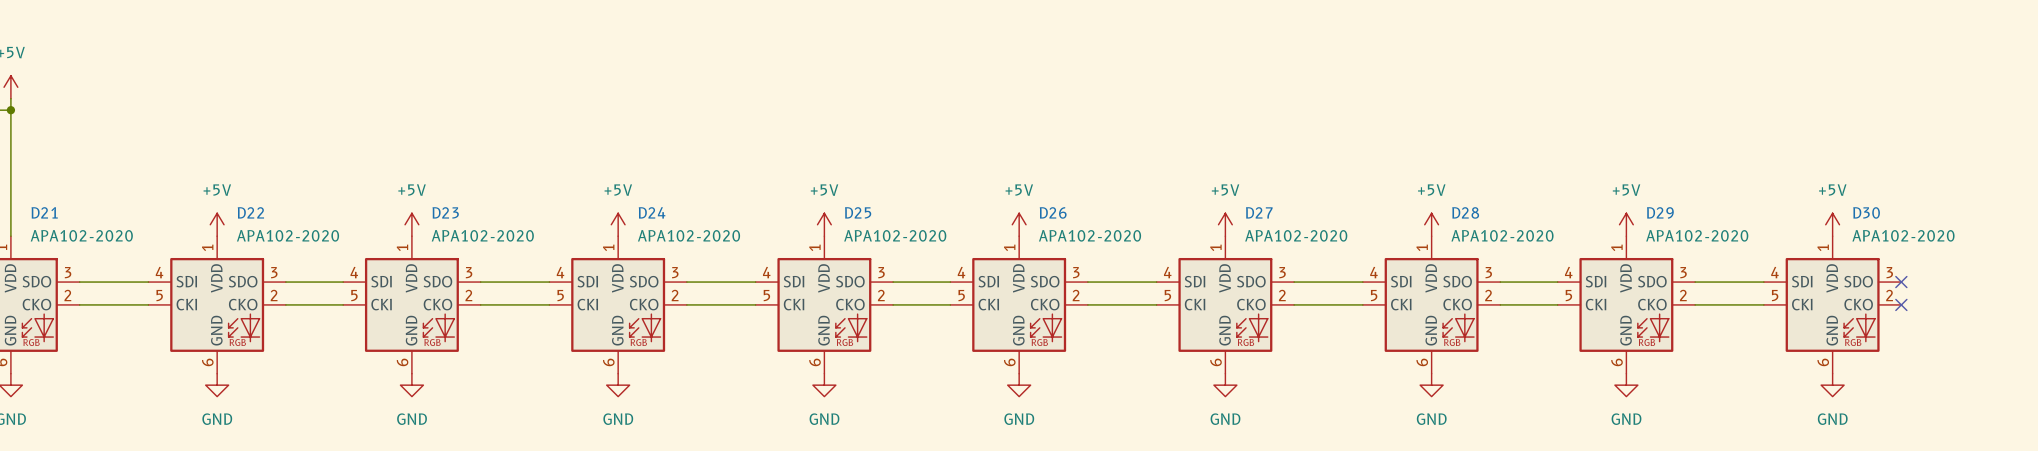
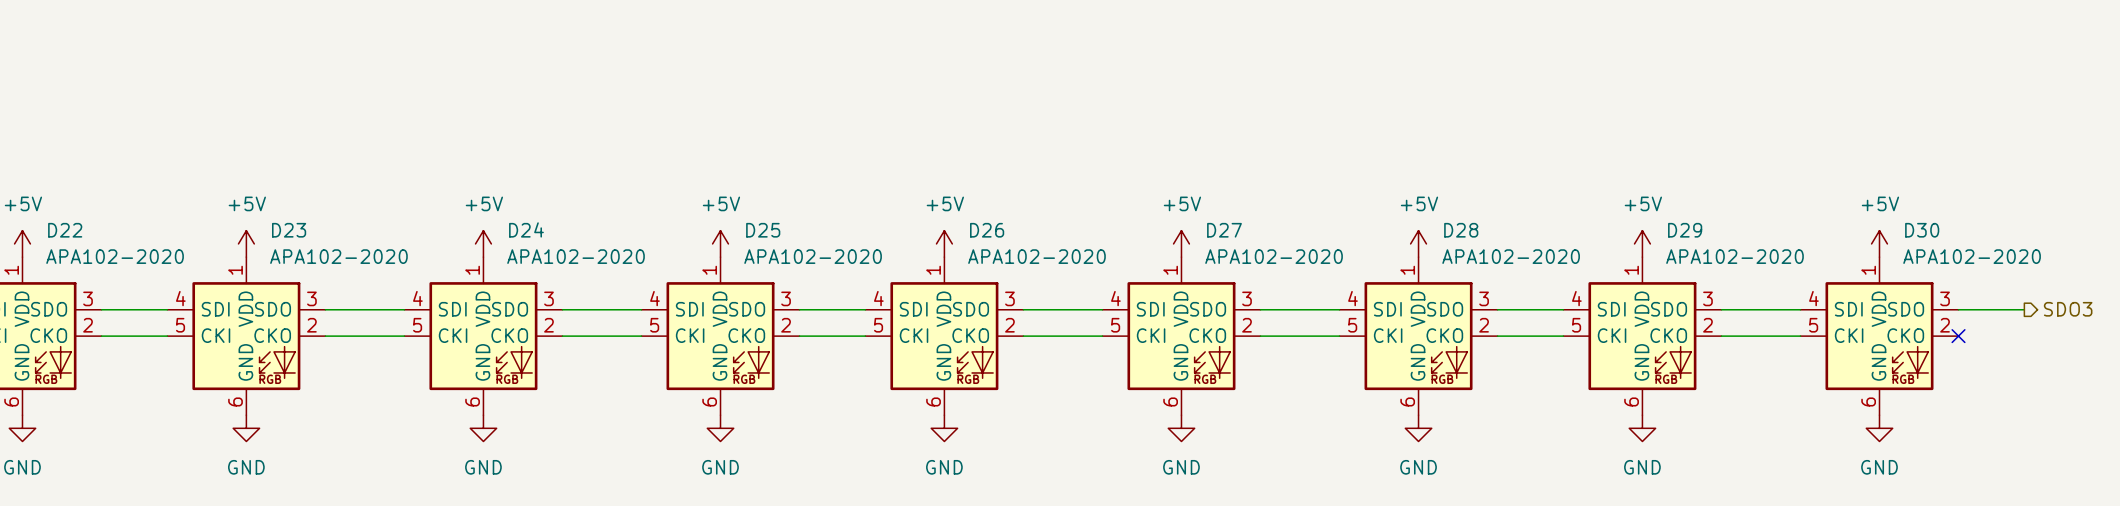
hierarchical label: none -> SDO3 (2068, 309)
wire: none -> (1958, 309) (2024, 309)
no-connect mark: (1901, 282) -> none

